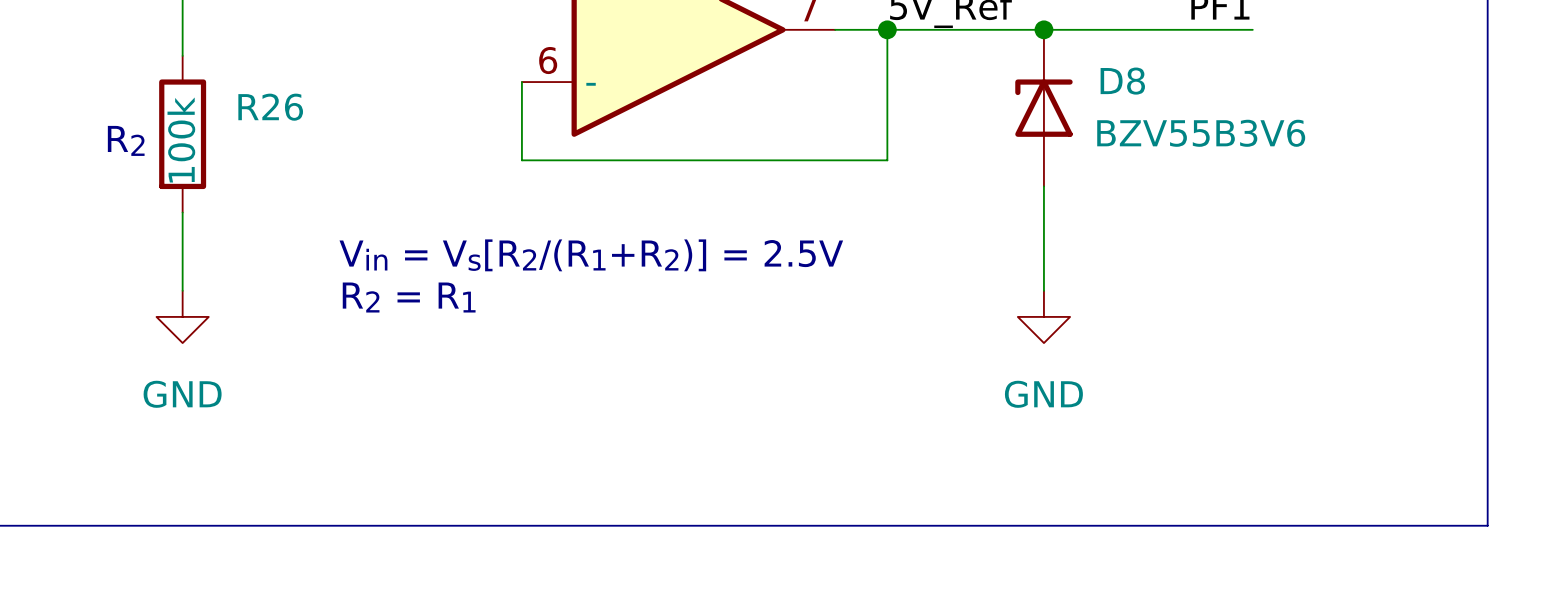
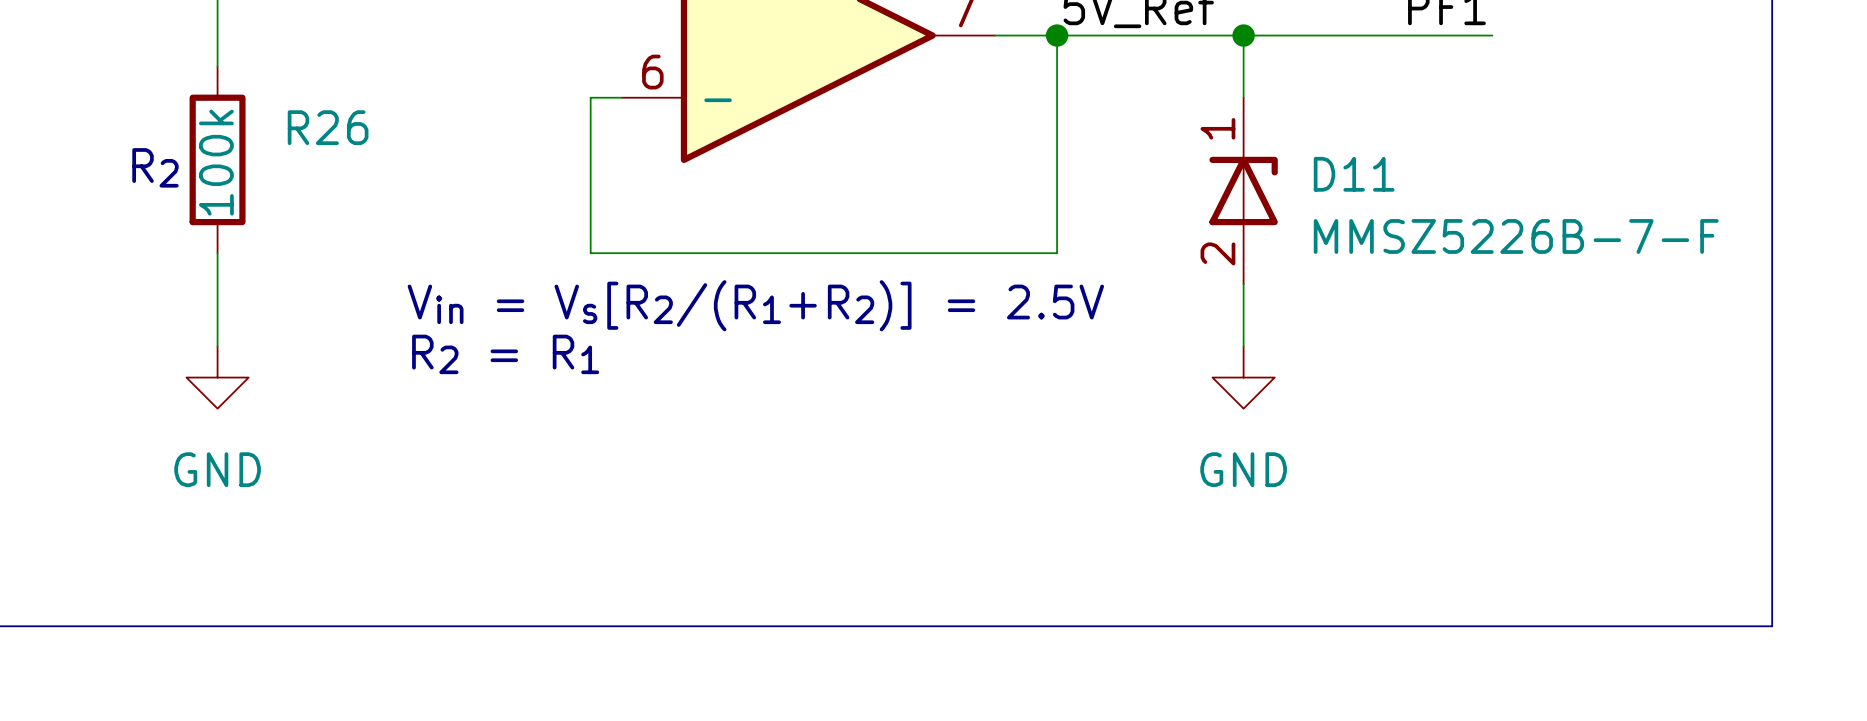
wire: (521, 82) (521, 160) (887, 160) -> (621, 97) (590, 97) (590, 253) (1057, 253) (1057, 191)
D8: BZV55B3V6 (1043, 108) -> none
D11: none -> MMSZ5226B-7-F (1243, 191)

